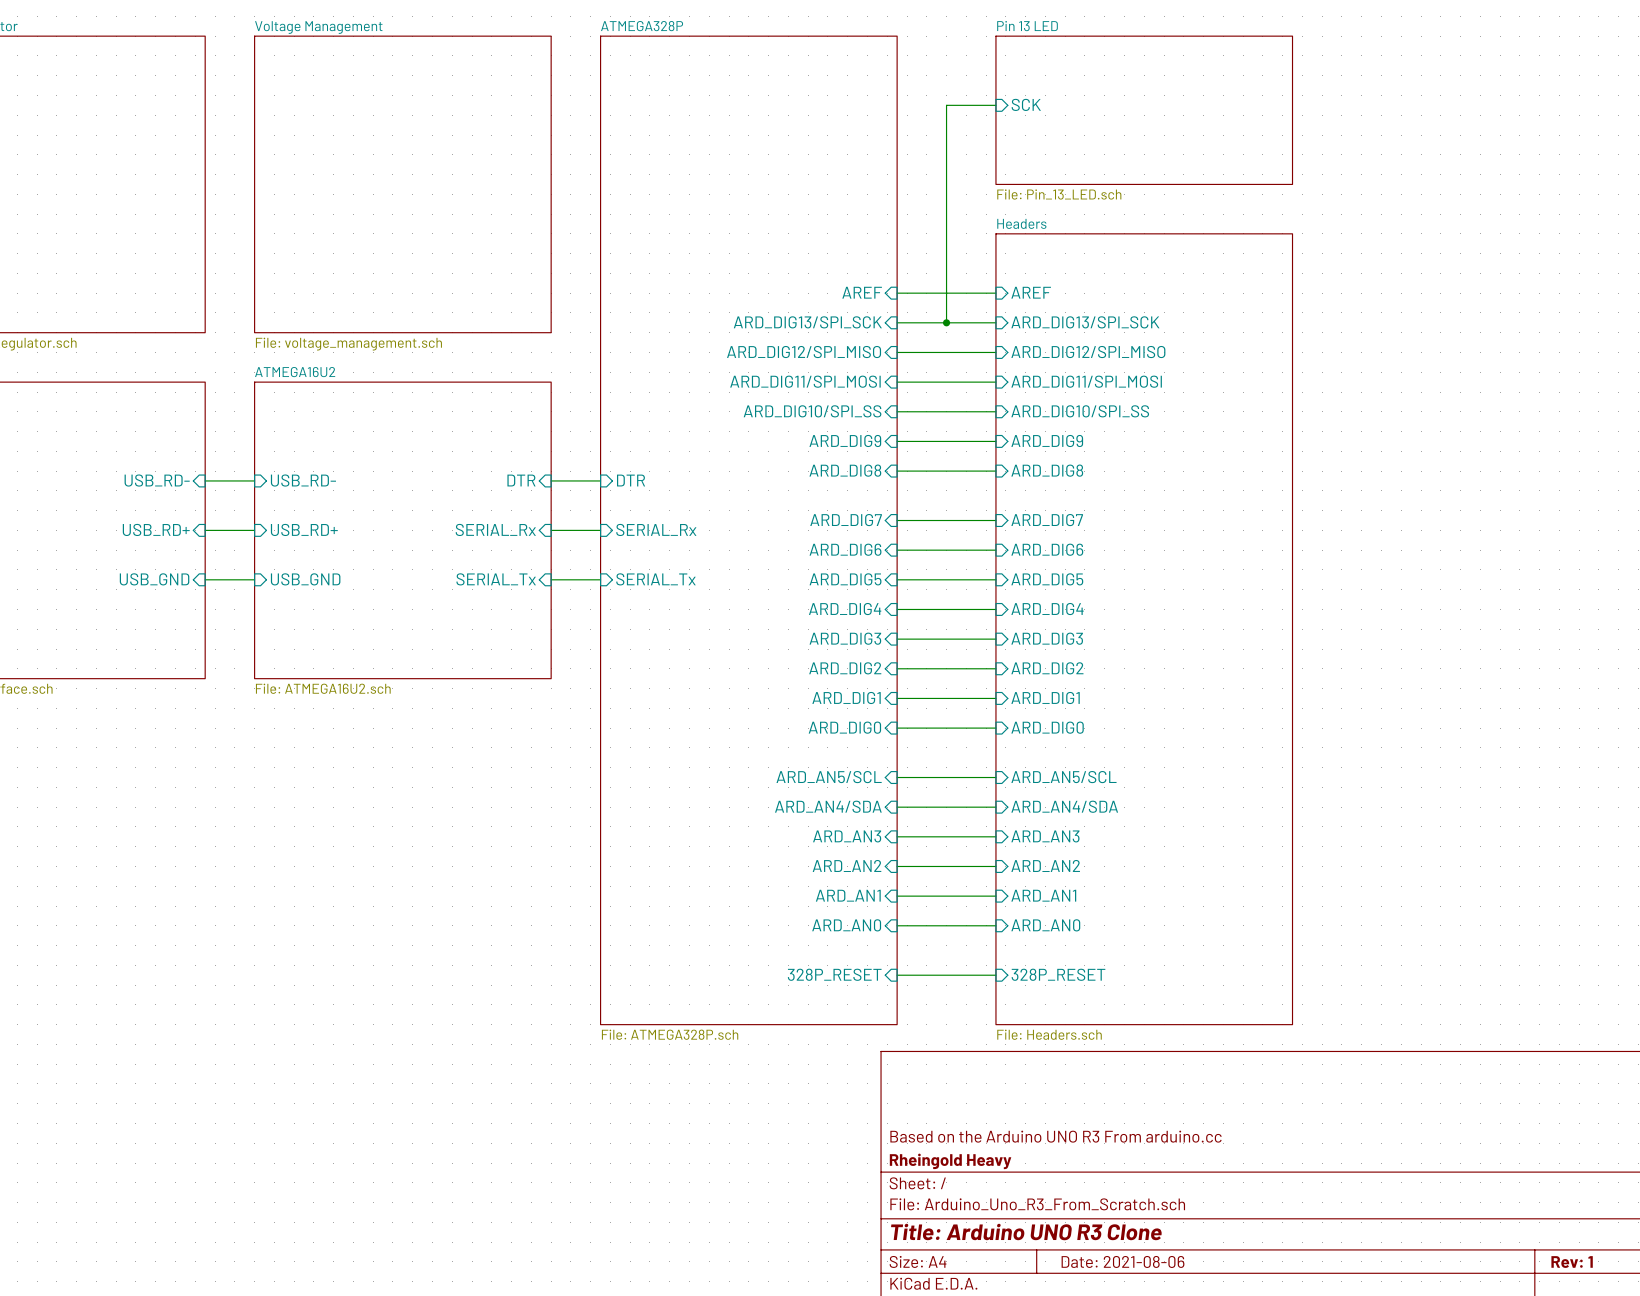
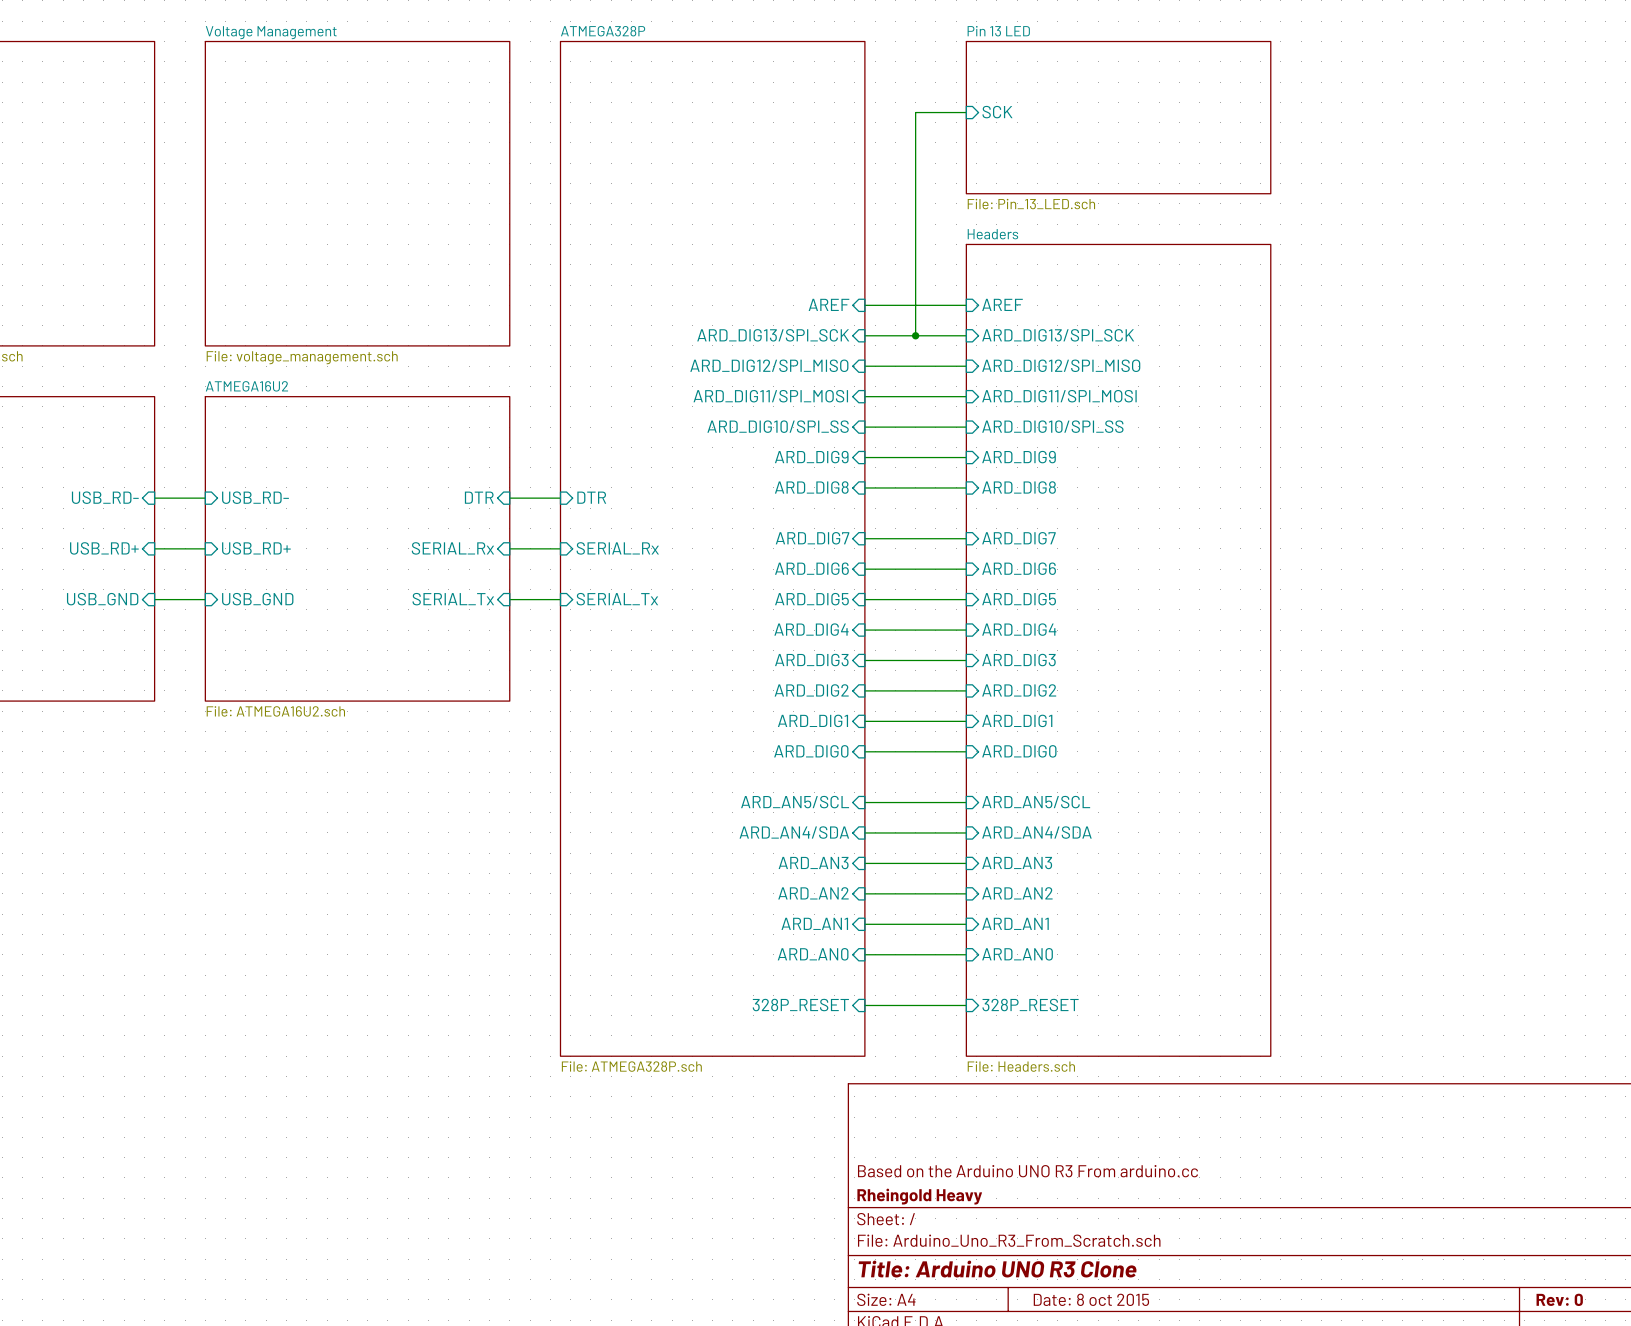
title block: Date: 2021-08-06 (1123, 1261) -> Date: 8 oct 2015 (1091, 1299)
title block: Rev: 1 (1572, 1262) -> Rev: 0 (1559, 1299)

